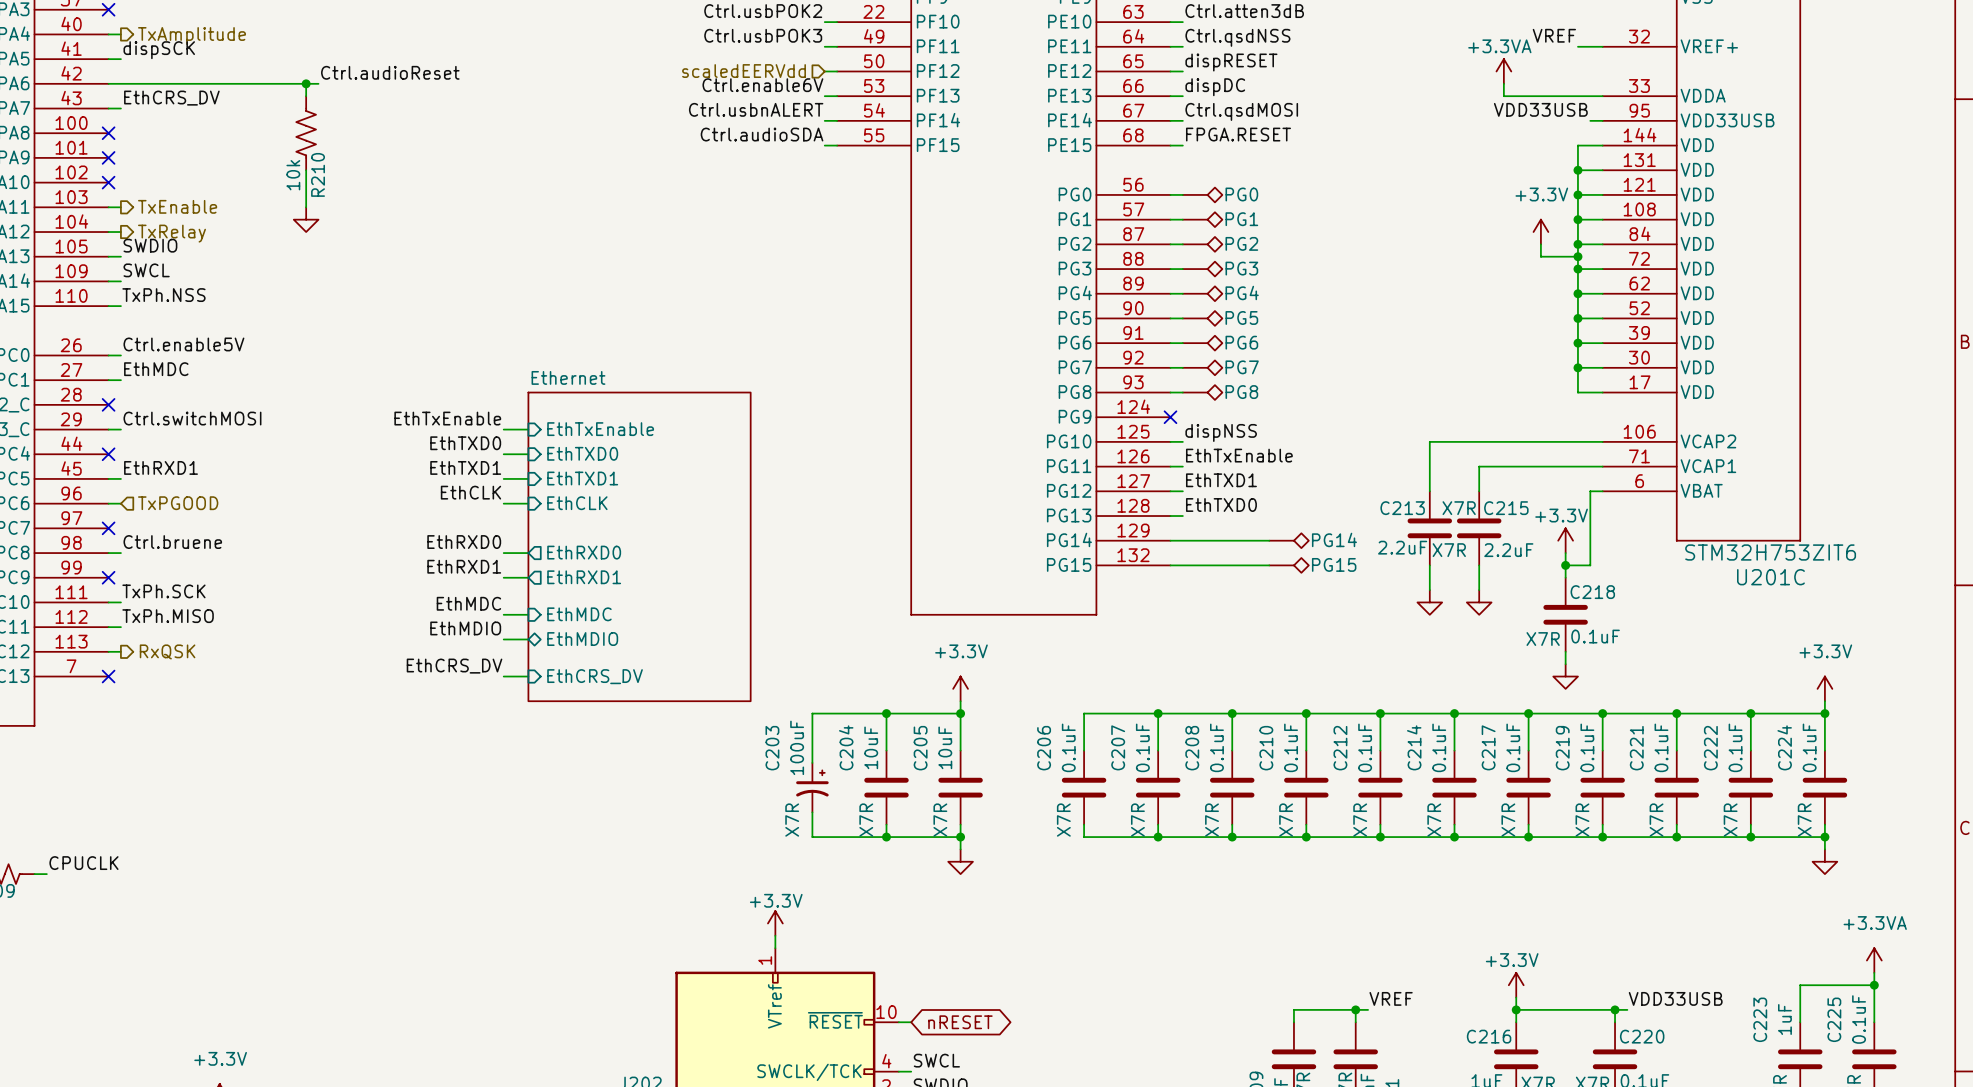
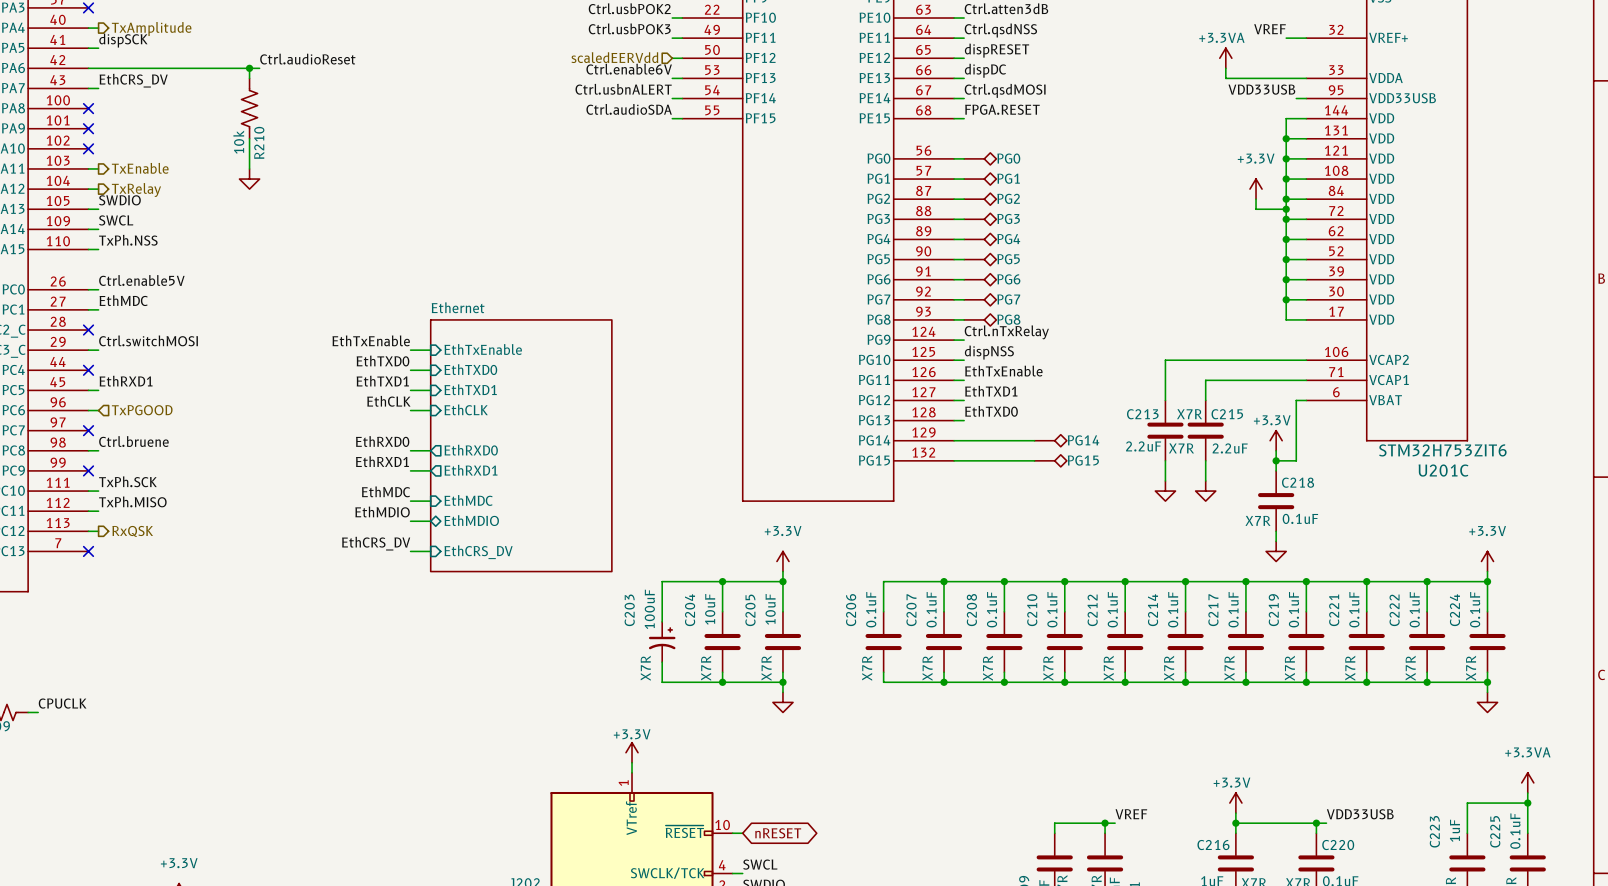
label: none -> Ctrl.nTxRelay (1006, 332)
wire: none -> (954, 340) (964, 340)
no-connect mark: (1170, 417) -> none

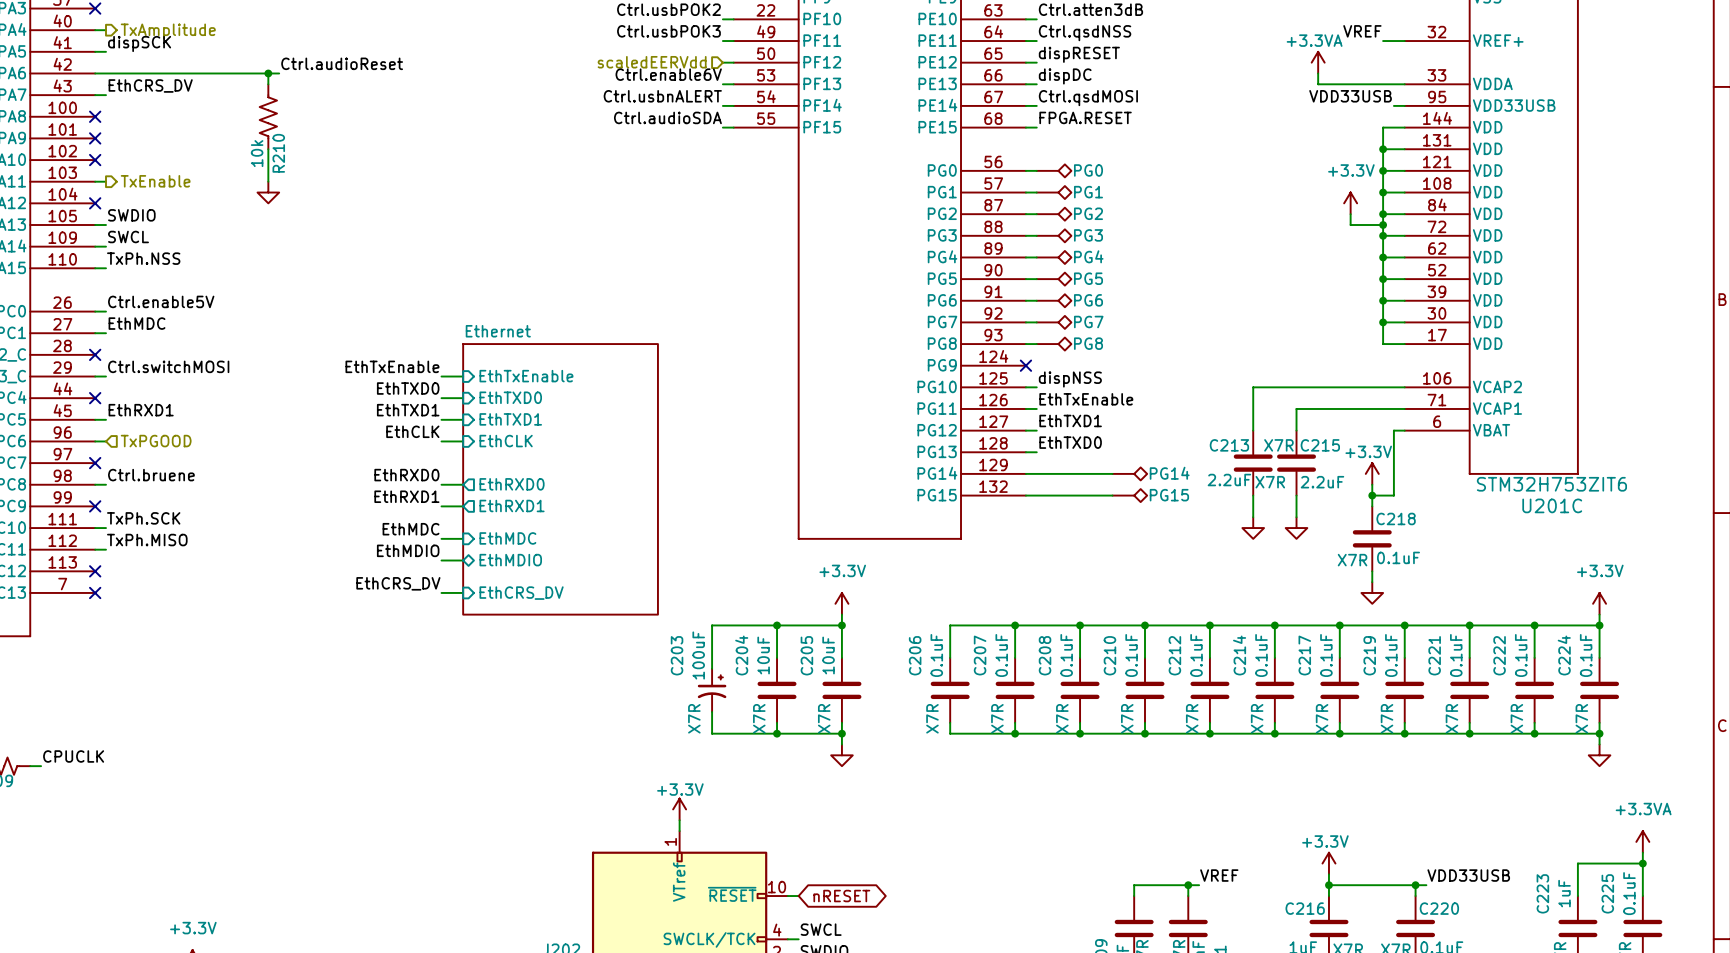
wire: (88, 189) (98, 189) -> none
no-connect mark: none -> (95, 203)
hierarchical label: TxRelay (136, 189) -> none
label: Ctrl.nTxRelay (1006, 332) -> none
wire: (954, 340) (964, 340) -> none
no-connect mark: none -> (1025, 365)
wire: (88, 531) (98, 531) -> none
no-connect mark: none -> (95, 571)
hierarchical label: RxQSK (132, 531) -> none

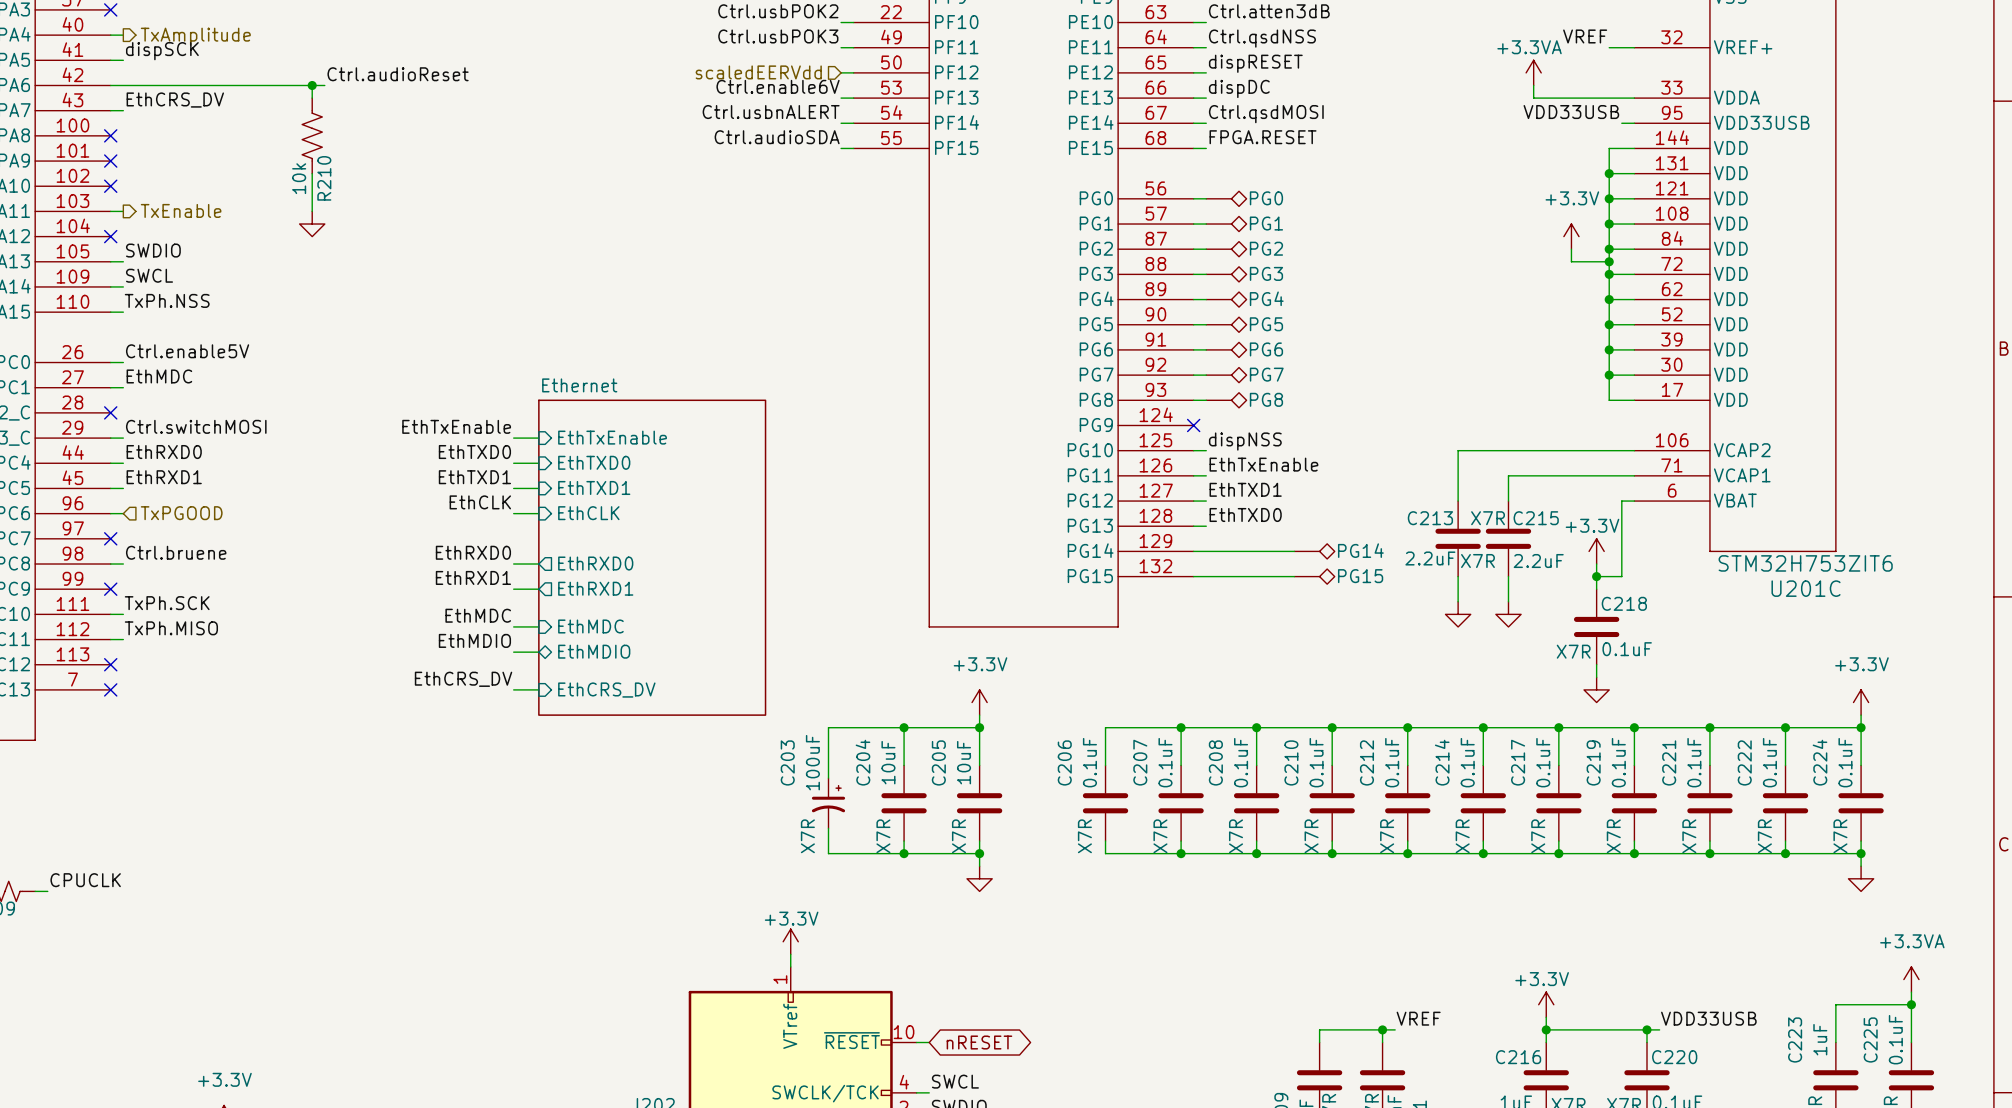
label: none -> EthRXD0 (164, 452)
wire: none -> (110, 463) (123, 463)
no-connect mark: (95, 398) -> none

